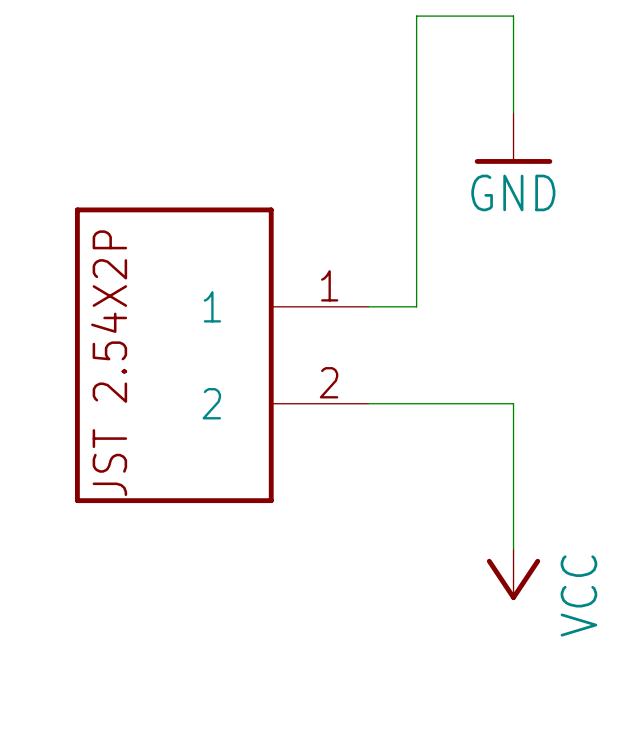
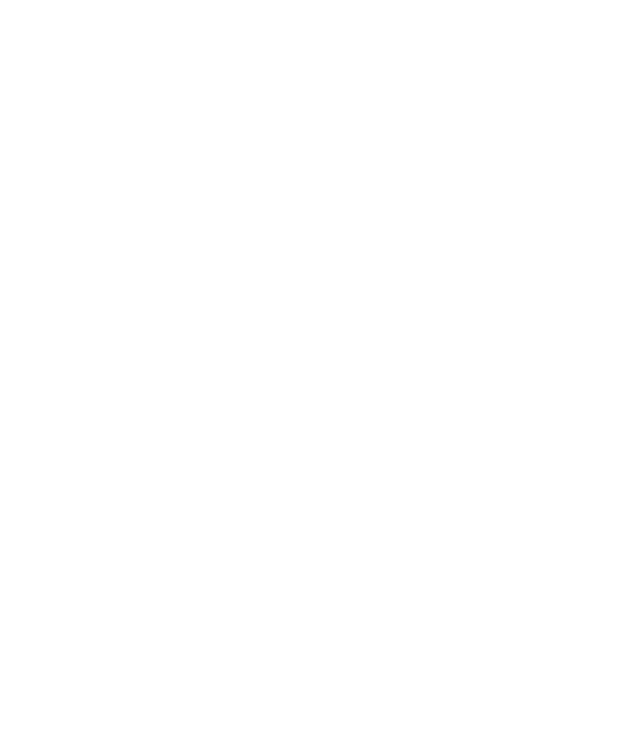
wire: (513, 113) (513, 16) (416, 16) (416, 306) (368, 306) -> none
power symbol: GND (513, 138) -> none
part: (221, 355) -> none
wire: (368, 403) (513, 403) (513, 549) -> none
power symbol: VCC (513, 574) -> none

